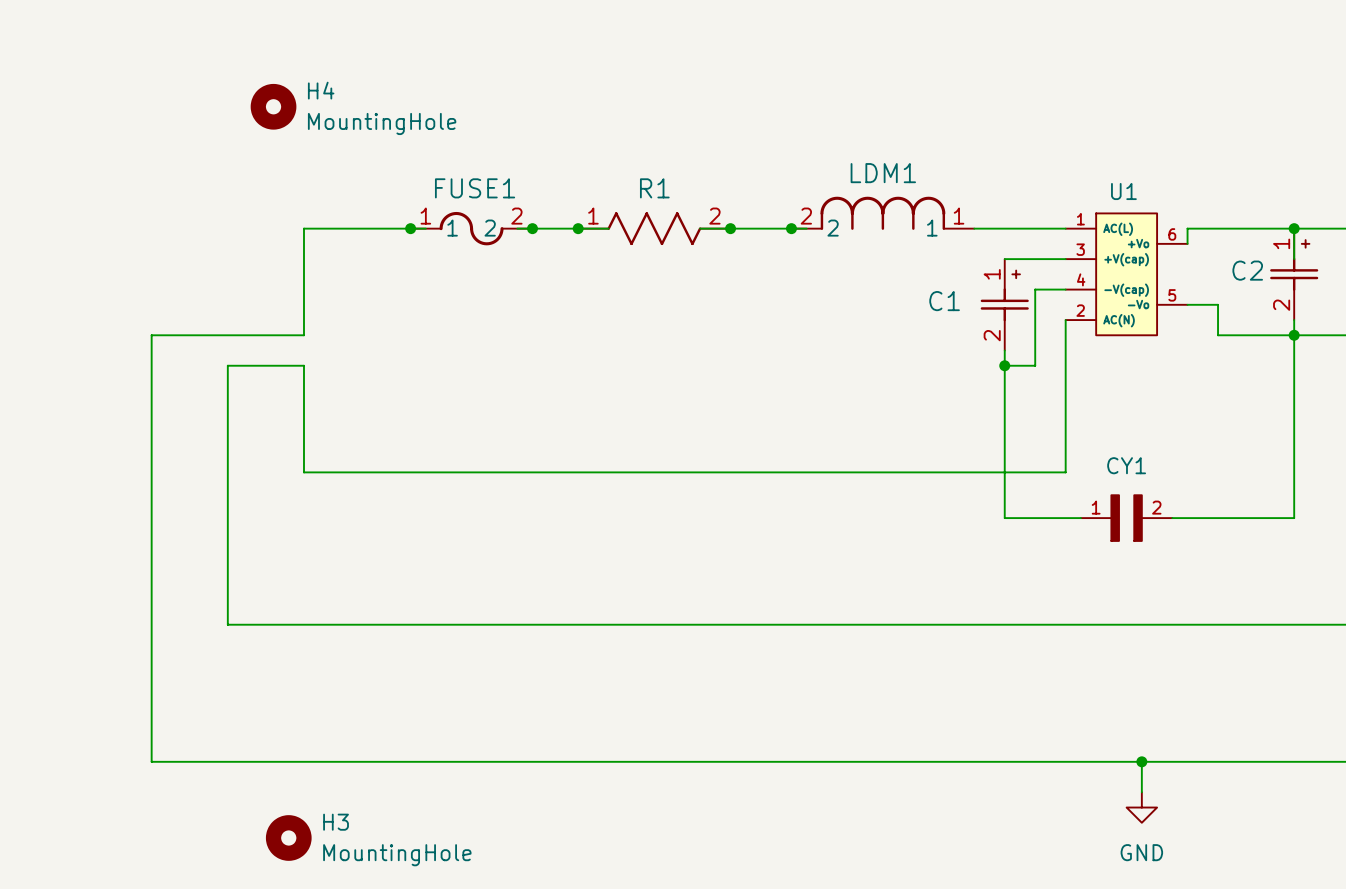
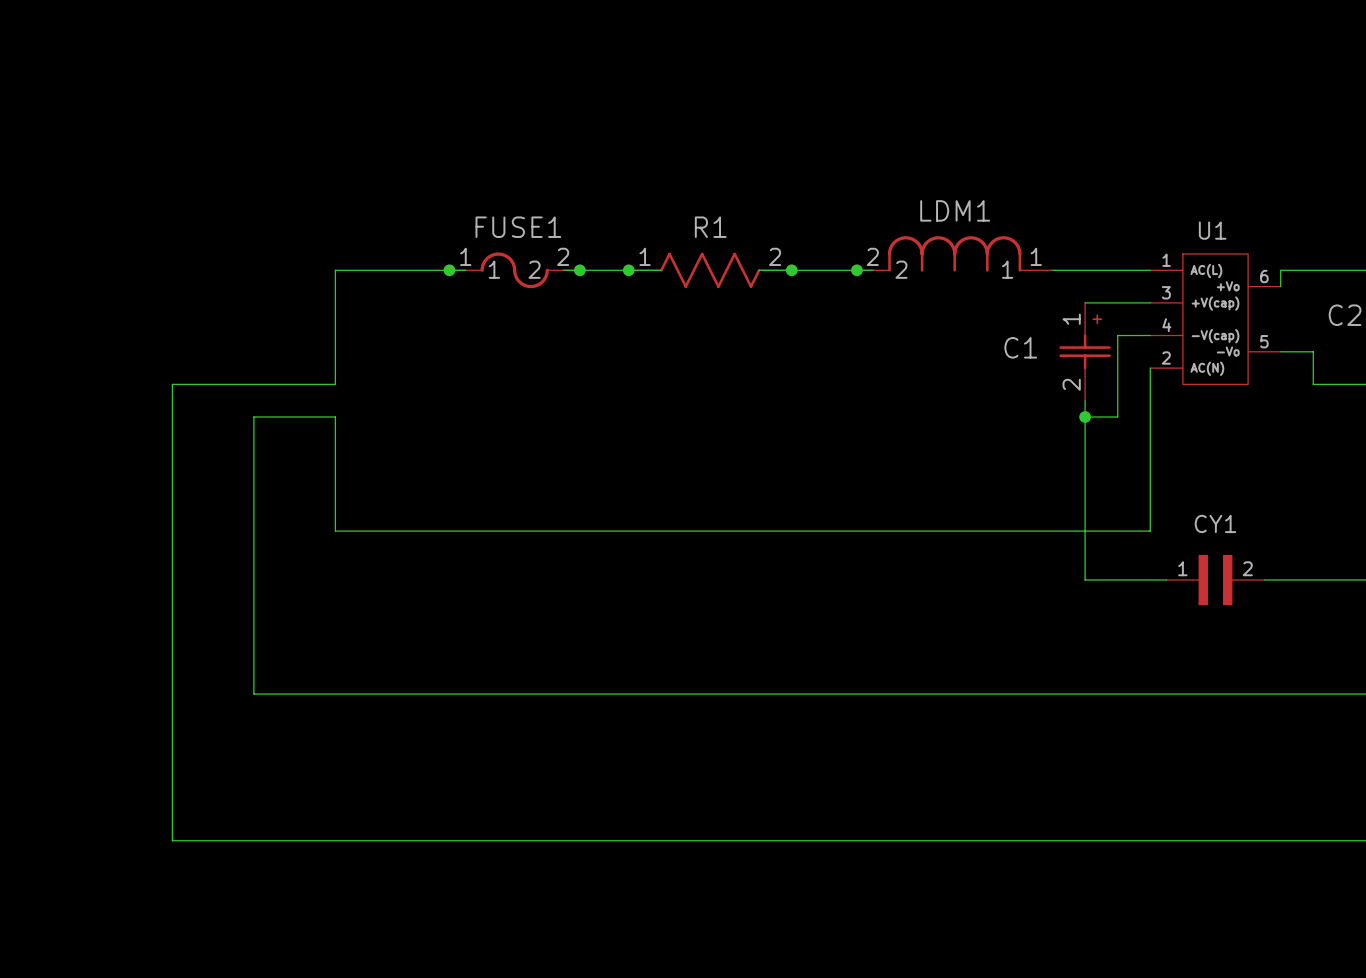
H4: MountingHole (273, 106) -> none
wire: (1141, 761) (1141, 792) -> none
junction: (1141, 761) -> none
power symbol: GND (1141, 807) -> none
H3: MountingHole (288, 837) -> none

